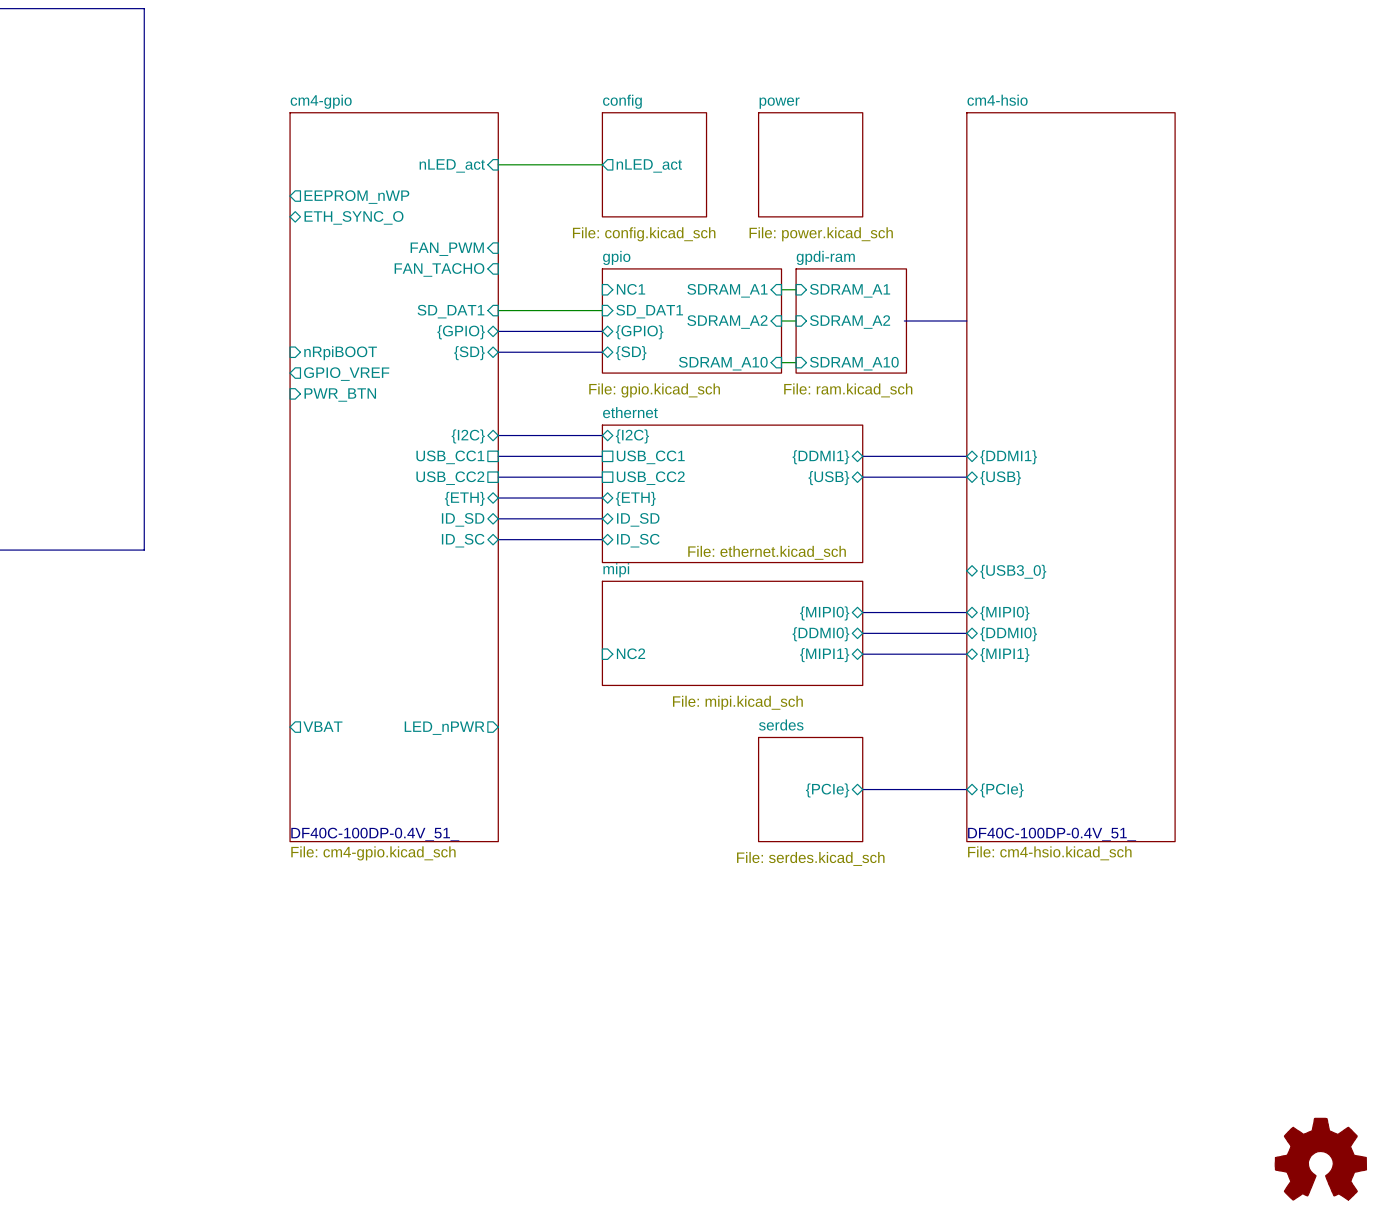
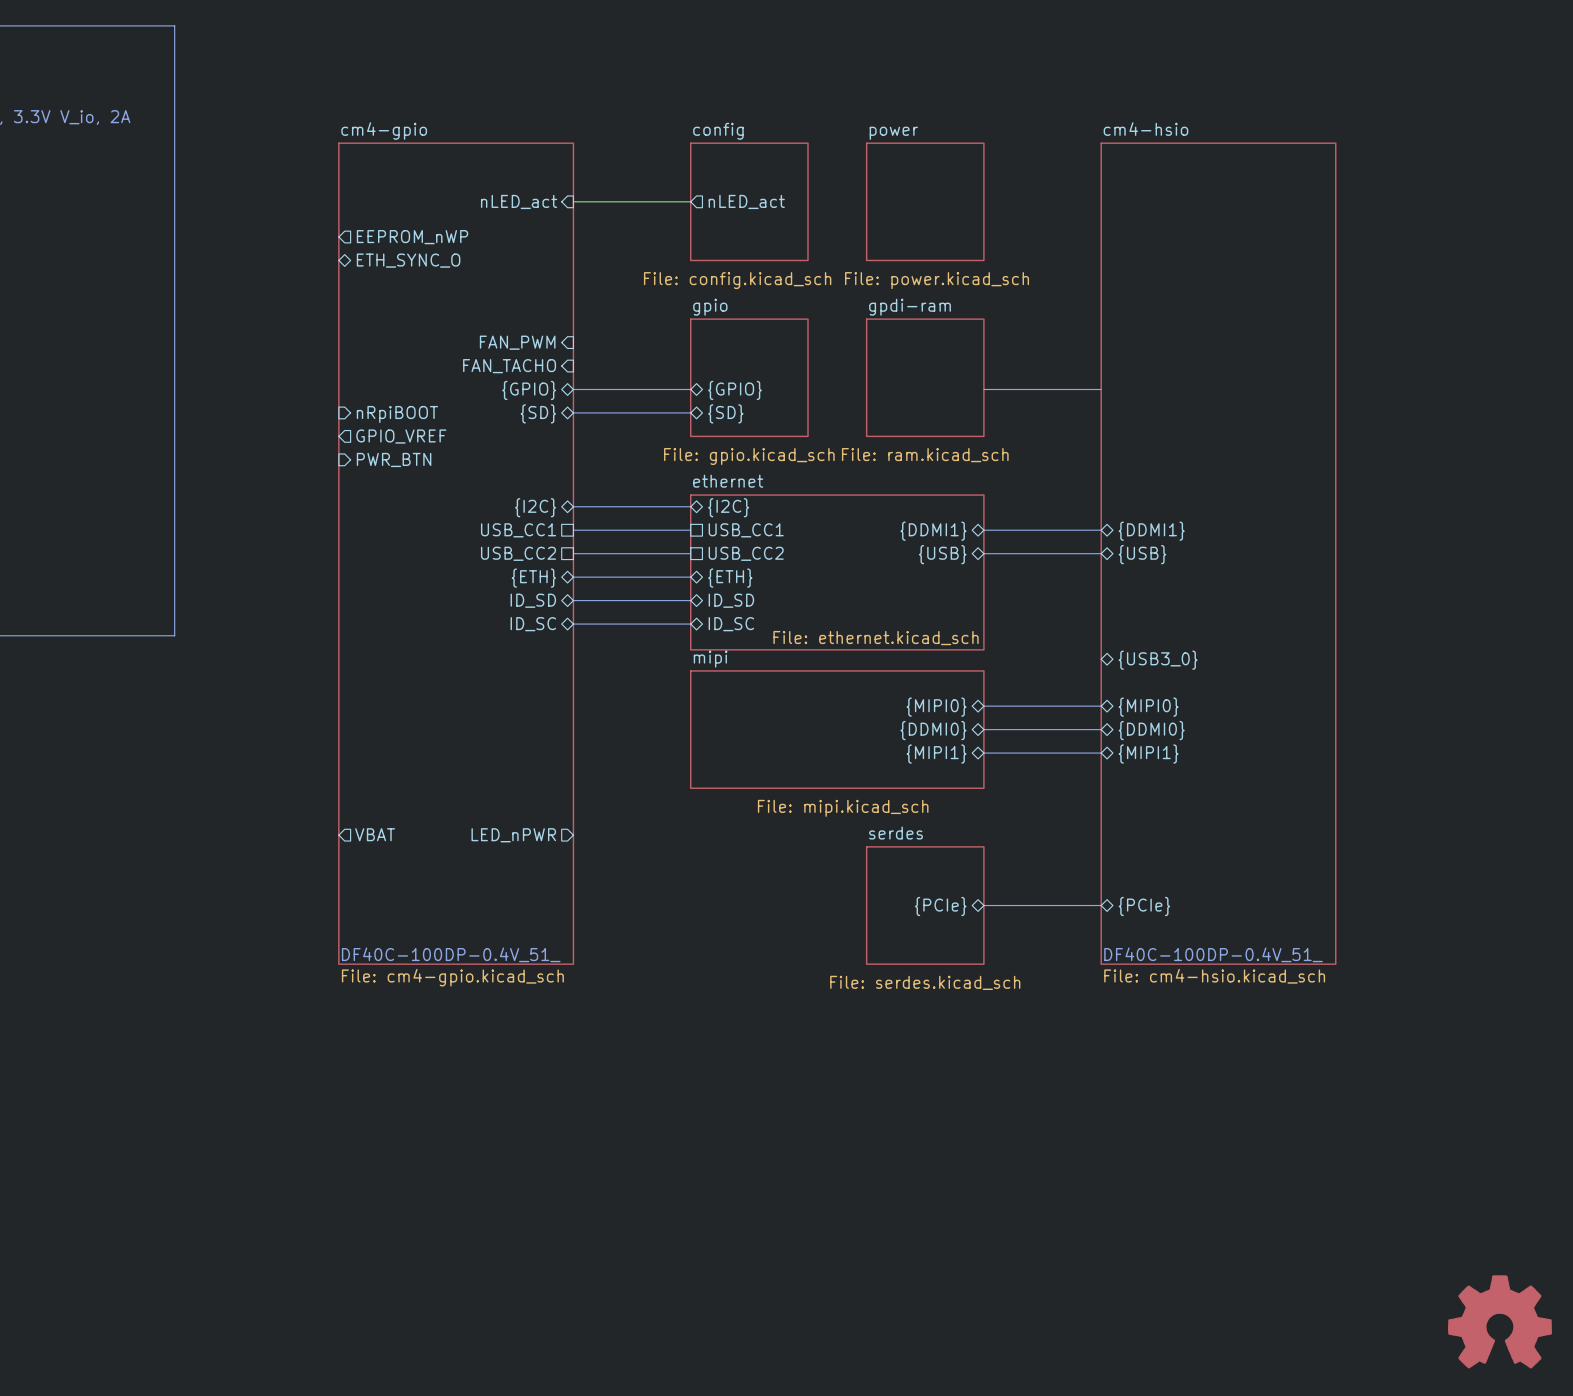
sheet pin position: FAN_PWM (447, 249) -> FAN_PWM (517, 342)
sheet pin: FAN_TACHO (439, 269) -> none
sheet pin: NC1 (631, 289) -> none
wire: (781, 289) (796, 289) -> none
sheet pin: SDRAM_A1 (727, 290) -> none
sheet pin: SDRAM_A1 (850, 290) -> none
wire: (498, 310) (602, 310) -> none
sheet pin: SD_DAT1 (450, 311) -> FAN_TACHO (509, 366)
sheet pin: SD_DAT1 (649, 311) -> none
sheet gpio: none -> File: gpio.kicad_sch (749, 377)
sheet gpio: File: gpio.kicad_sch (691, 321) -> none
wire: (781, 321) (796, 321) -> none
sheet gpdi-ram: none -> File: ram.kicad_sch (925, 377)
sheet gpdi-ram: File: ram.kicad_sch (851, 321) -> none
bus: (904, 321) (966, 321) -> none
sheet pin: SDRAM_A2 (727, 322) -> none
sheet pin: SDRAM_A2 (850, 322) -> none
bus: none -> (983, 389) (1101, 389)
wire: (781, 362) (796, 362) -> none
sheet pin: SDRAM_A10 (723, 363) -> none
sheet pin: SDRAM_A10 (854, 363) -> none
sheet pin: NC2 (631, 653) -> none

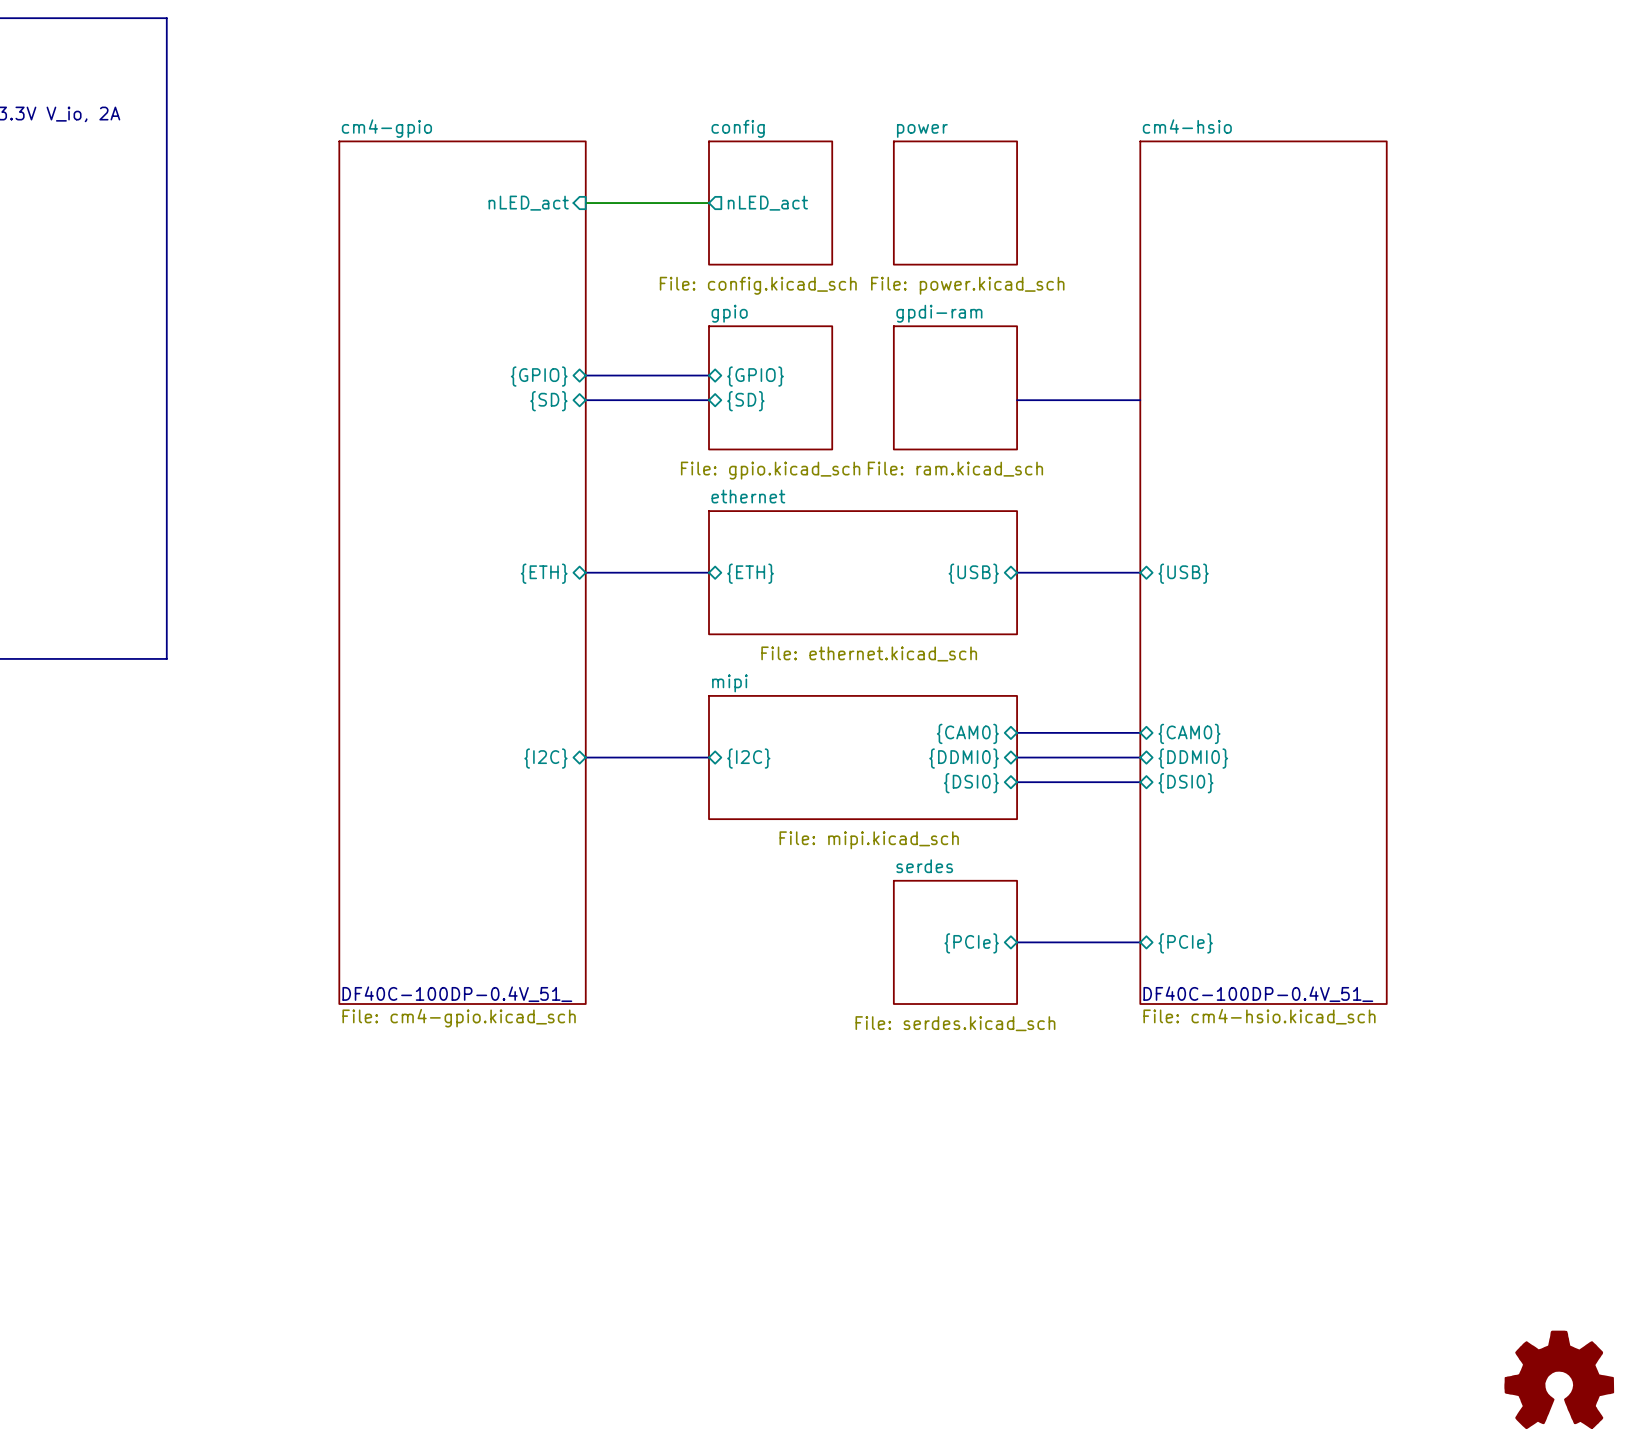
sheet pin: EEPROM_nWP (412, 237) -> none
sheet pin: ETH_SYNC_O (408, 260) -> none
sheet pin: FAN_PWM (517, 342) -> none
sheet pin shape: input (509, 366) -> bidirectional (539, 376)
sheet pin: FAN_TACHO (509, 366) -> {GPIO} (539, 376)
sheet pin: none -> {GPIO} (755, 376)
sheet pin: {GPIO} (529, 390) -> {SD} (548, 401)
sheet pin: {GPIO} (735, 390) -> {SD} (745, 401)
bus: (573, 412) (690, 412) -> (585, 375) (708, 375)
sheet pin: {SD} (538, 413) -> none
sheet pin: {SD} (725, 413) -> none
sheet pin: nRpiBOOT (397, 414) -> none
sheet pin: GPIO_VREF (401, 436) -> none
sheet pin: PWR_BTN (394, 459) -> none
bus: (573, 506) (690, 506) -> none
sheet pin: {I2C} (535, 507) -> none
sheet pin: {I2C} (728, 507) -> none
sheet pin: USB_CC1 (518, 530) -> none
bus: (573, 530) (690, 530) -> none
sheet pin: USB_CC1 (746, 530) -> none
bus: (983, 530) (1101, 530) -> none
sheet pin: {DDMI1} (933, 531) -> none
sheet pin: {DDMI1} (1151, 531) -> none
sheet pin shape: passive (518, 553) -> bidirectional (544, 573)
sheet pin: USB_CC2 (518, 553) -> {ETH} (544, 573)
sheet pin shape: passive (746, 553) -> bidirectional (750, 573)
sheet pin: USB_CC2 (746, 553) -> {ETH} (750, 573)
sheet ethernet: none -> File: ethernet.kicad_sch (863, 572)
sheet ethernet: File: ethernet.kicad_sch (837, 572) -> none
bus: (573, 577) (690, 577) -> none
sheet pin: {ETH} (533, 578) -> none
sheet pin: {ETH} (730, 578) -> none
sheet pin: ID_SD (533, 600) -> none
bus: (573, 600) (690, 600) -> none
sheet pin: ID_SD (731, 600) -> none
sheet pin: ID_SC (533, 624) -> none
bus: (573, 624) (690, 624) -> (585, 757) (708, 757)
sheet pin: ID_SC (731, 624) -> none
sheet pin: {USB3_0} (1158, 660) -> none
sheet pin: {MIPI0} (936, 707) -> {CAM0} (967, 733)
sheet pin: {MIPI0} (1148, 707) -> {CAM0} (1189, 733)
sheet pin: none -> {I2C} (545, 758)
sheet pin: none -> {I2C} (748, 758)
sheet pin: {MIPI1} (936, 754) -> {DSI0} (971, 783)
sheet pin: {MIPI1} (1148, 754) -> {DSI0} (1185, 783)
sheet pin: VBAT (375, 834) -> none
sheet pin: LED_nPWR (513, 835) -> none

